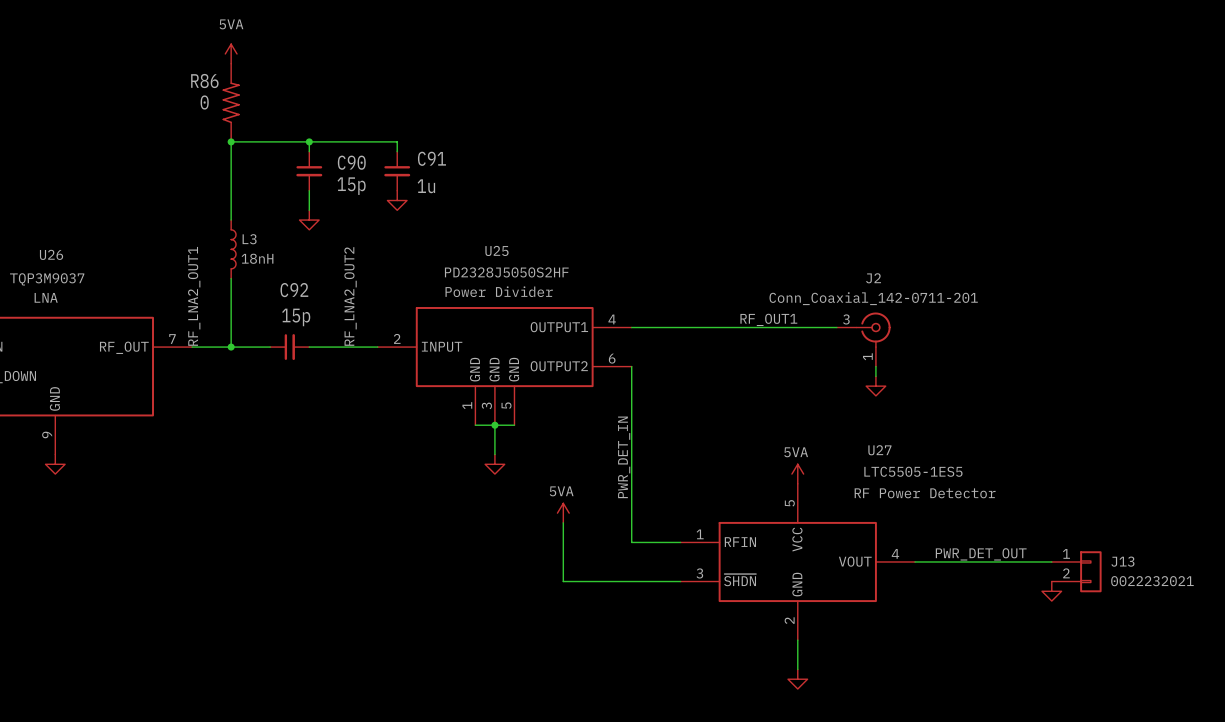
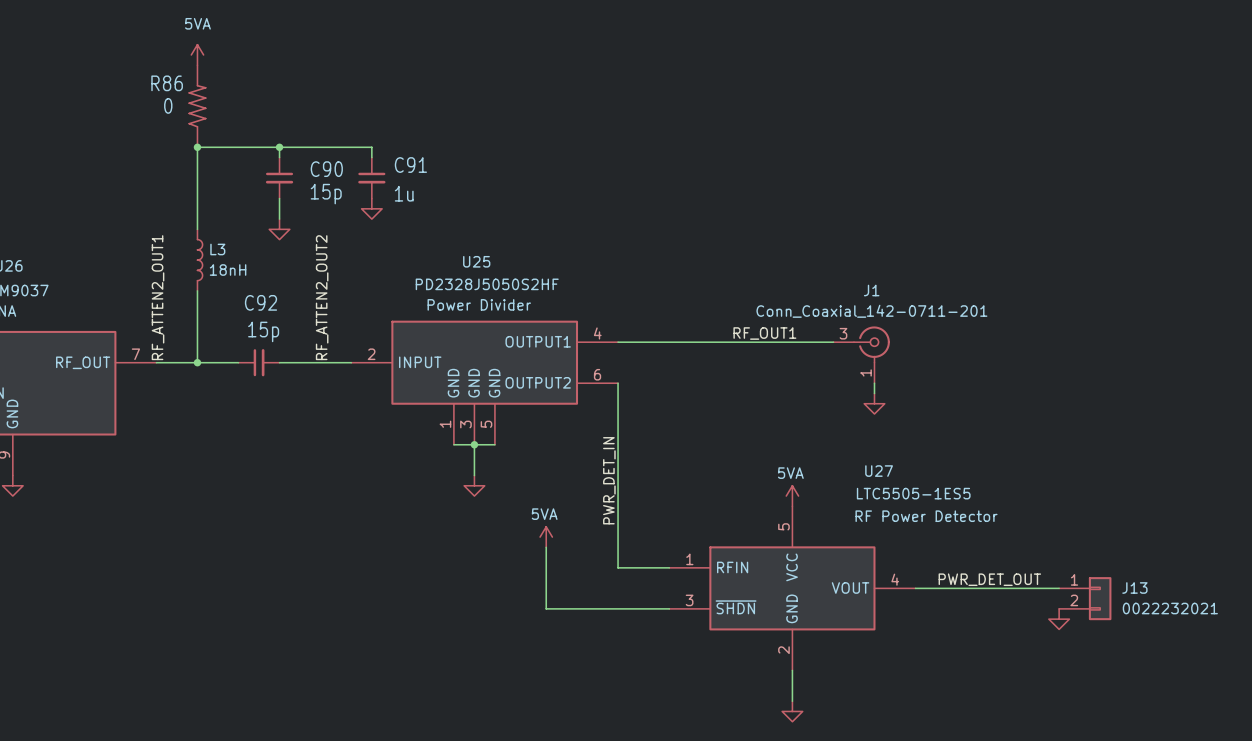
J2 name: J2 (873, 278) -> J1 (871, 290)
label: RF_LNA2_OUT1 (194, 296) -> RF_ATTEN2_OUT1 (158, 297)
label: RF_LNA2_OUT2 (350, 296) -> RF_ATTEN2_OUT2 (322, 297)

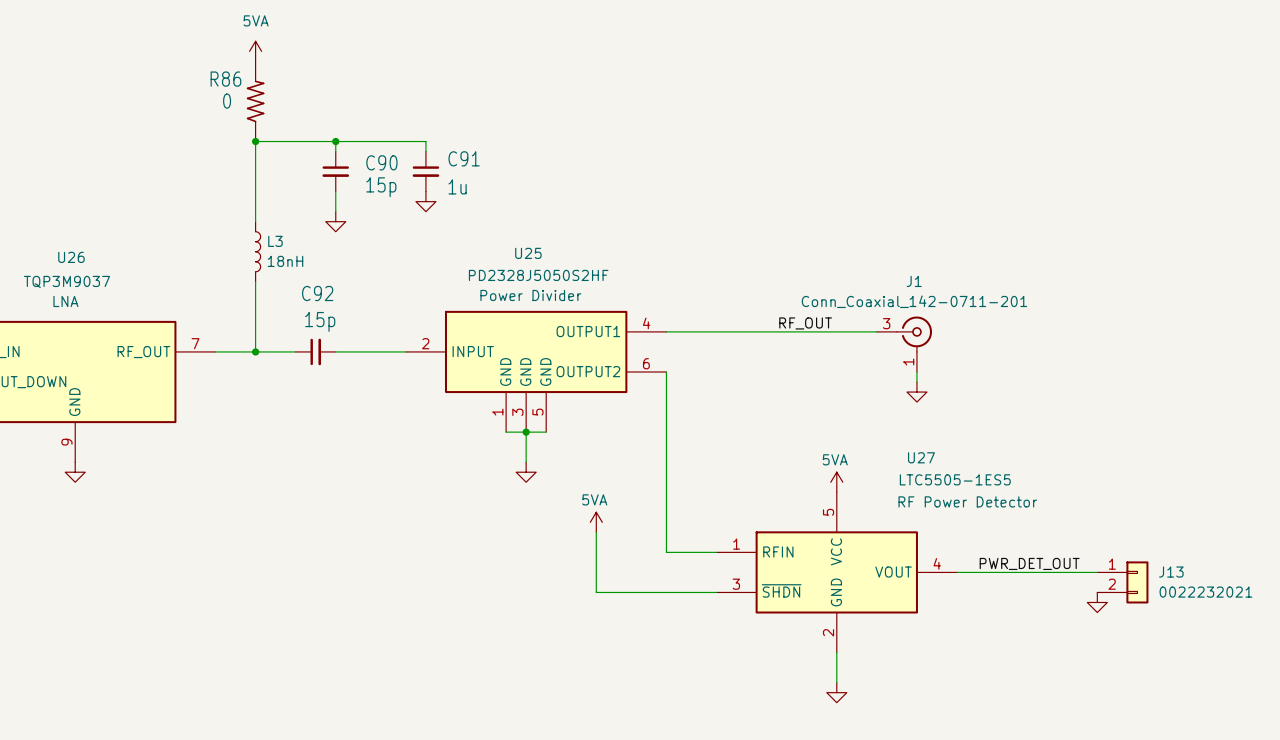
label: RF_ATTEN2_OUT1 (158, 297) -> none
label: RF_ATTEN2_OUT2 (322, 297) -> none
label: RF_OUT1 (764, 333) -> RF_OUT (805, 323)
label: PWR_DET_IN (609, 480) -> none

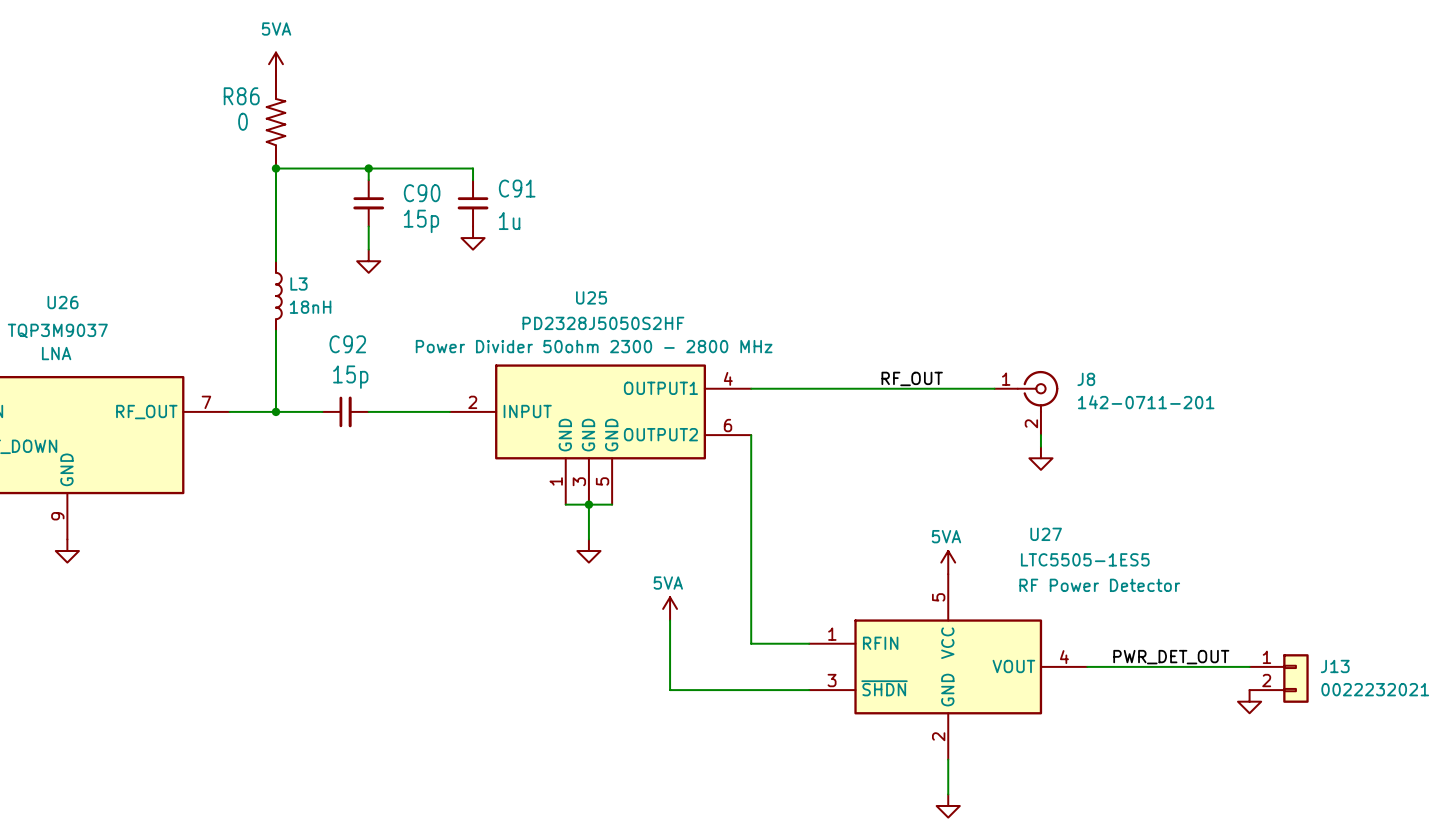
J1 name: J1 (914, 281) -> J8 (1086, 379)
U25 text: Power Divider (530, 295) -> Power Divider 50ohm 2300 - 2800 MHz (594, 346)
J1 value: Conn_Coaxial_142-0711-201 (914, 301) -> 142-0711-201 (1146, 402)
J1 pin number: 3 (886, 323) -> 1 (1006, 379)
J1 pin number: 1 (908, 361) -> 2 (1031, 423)

